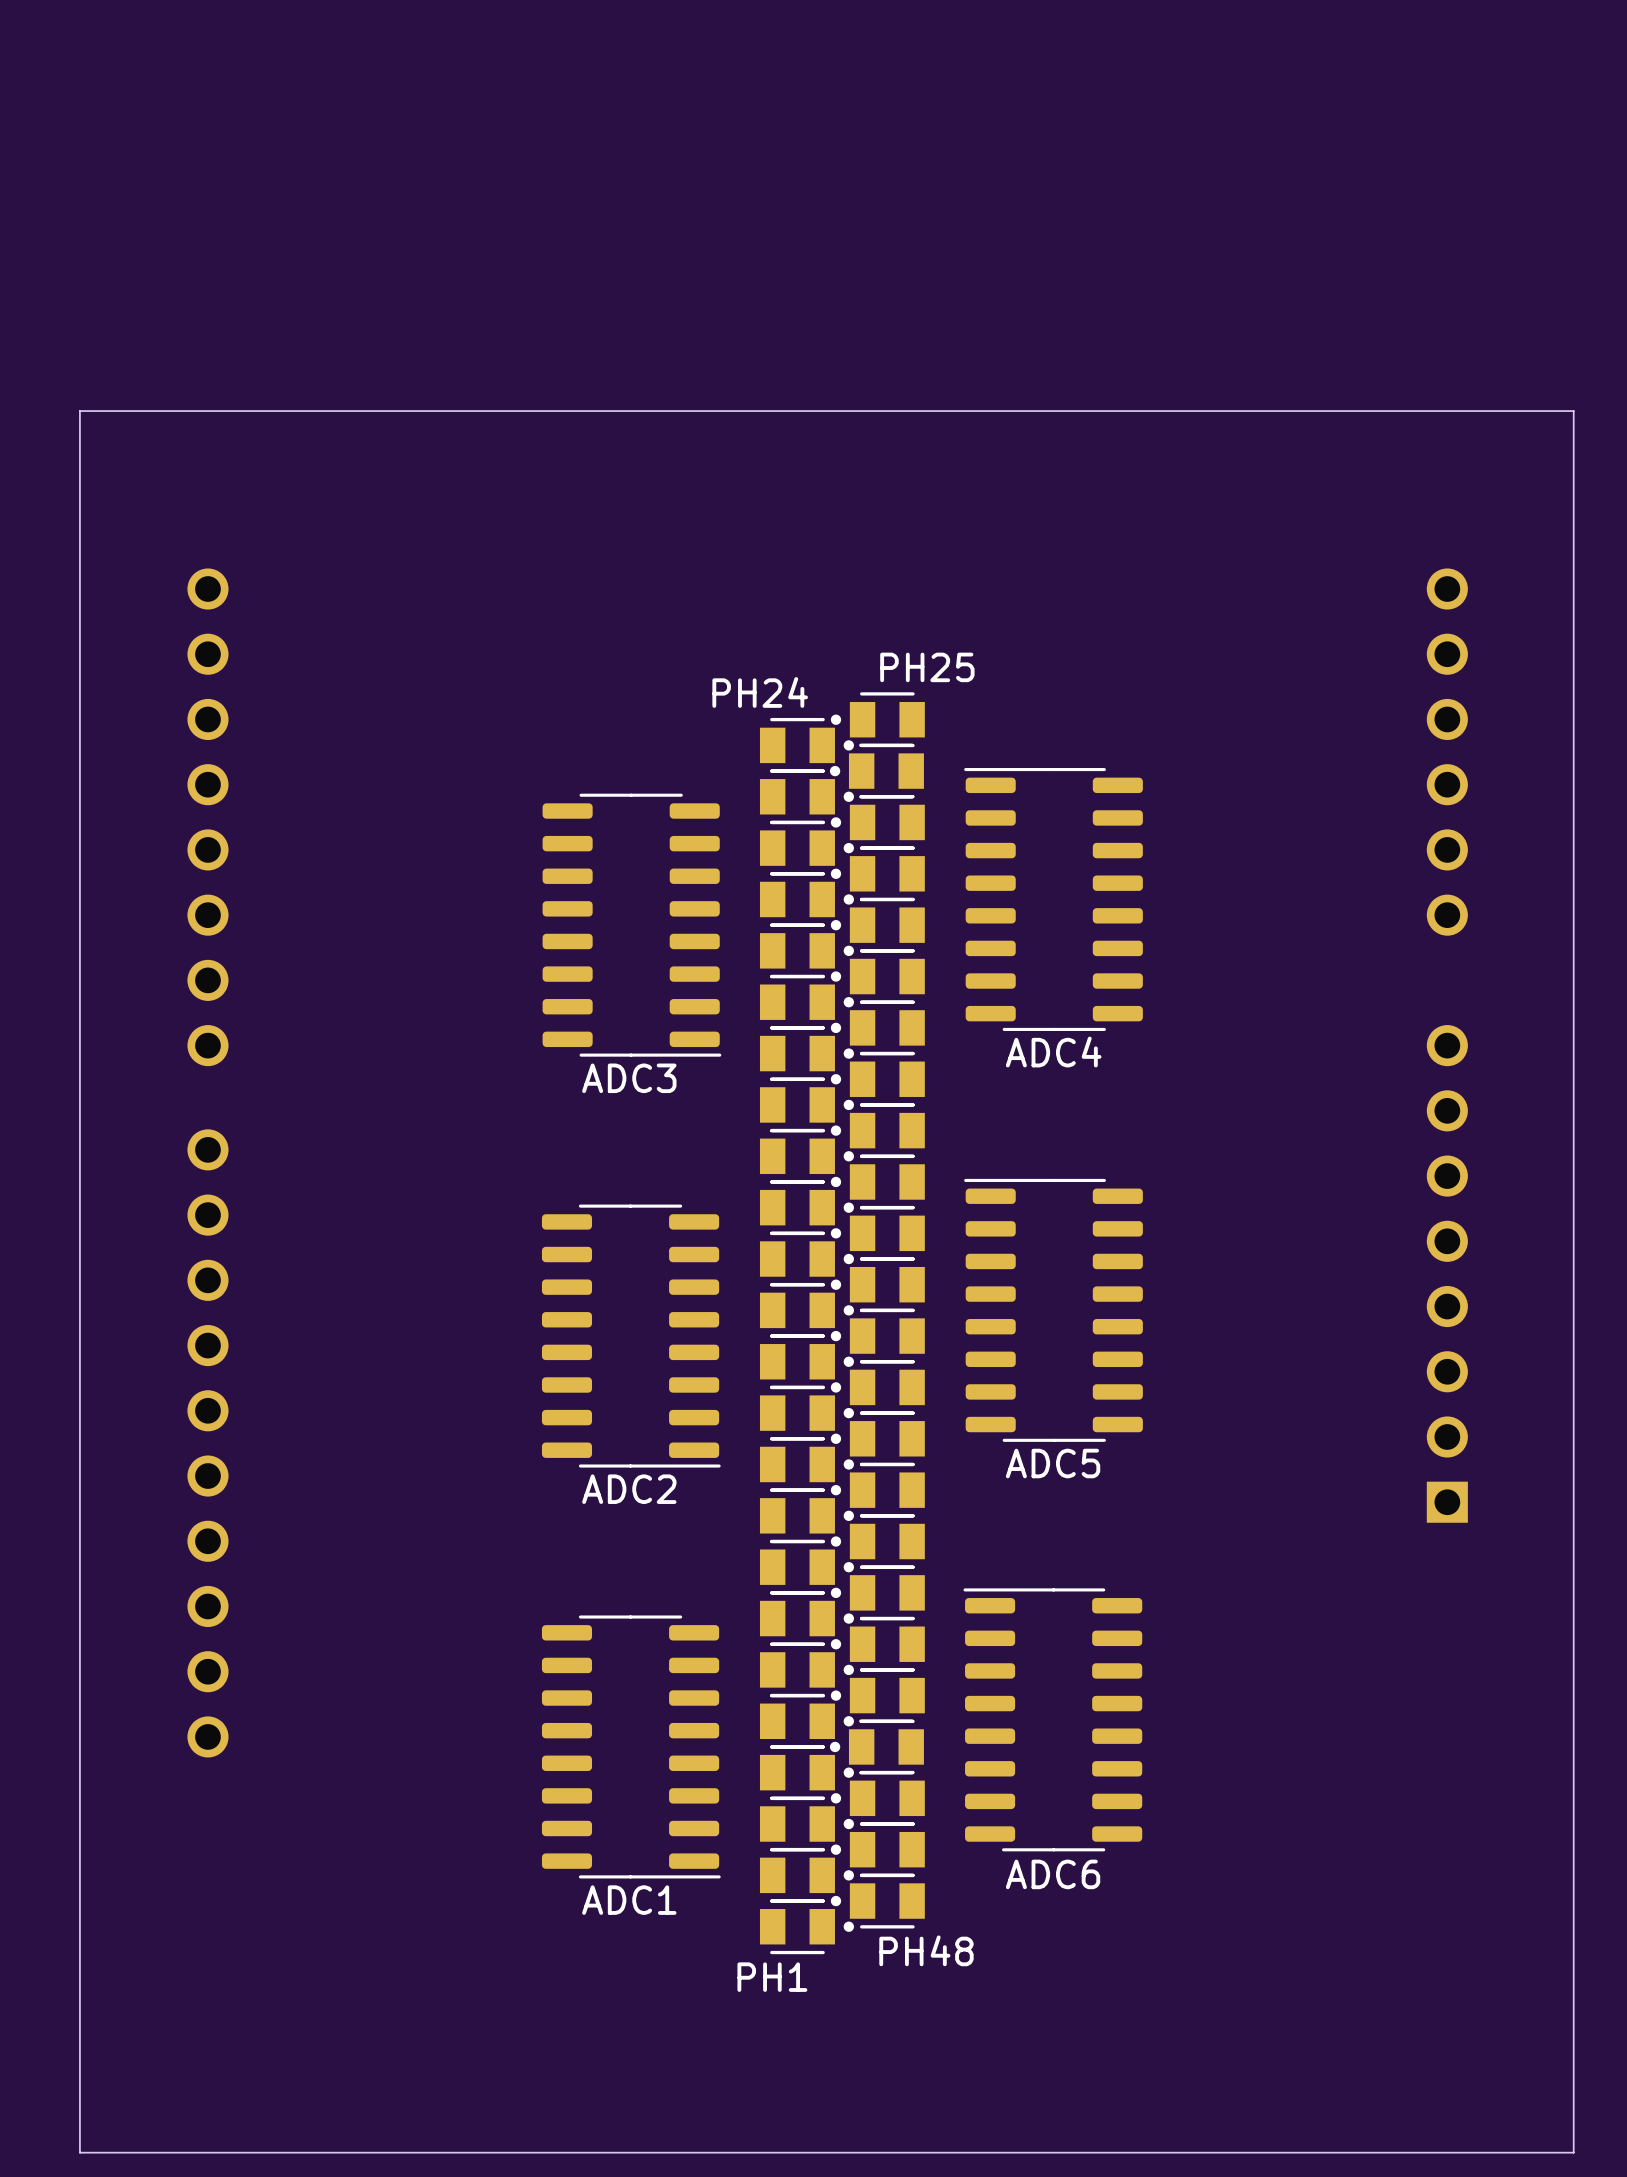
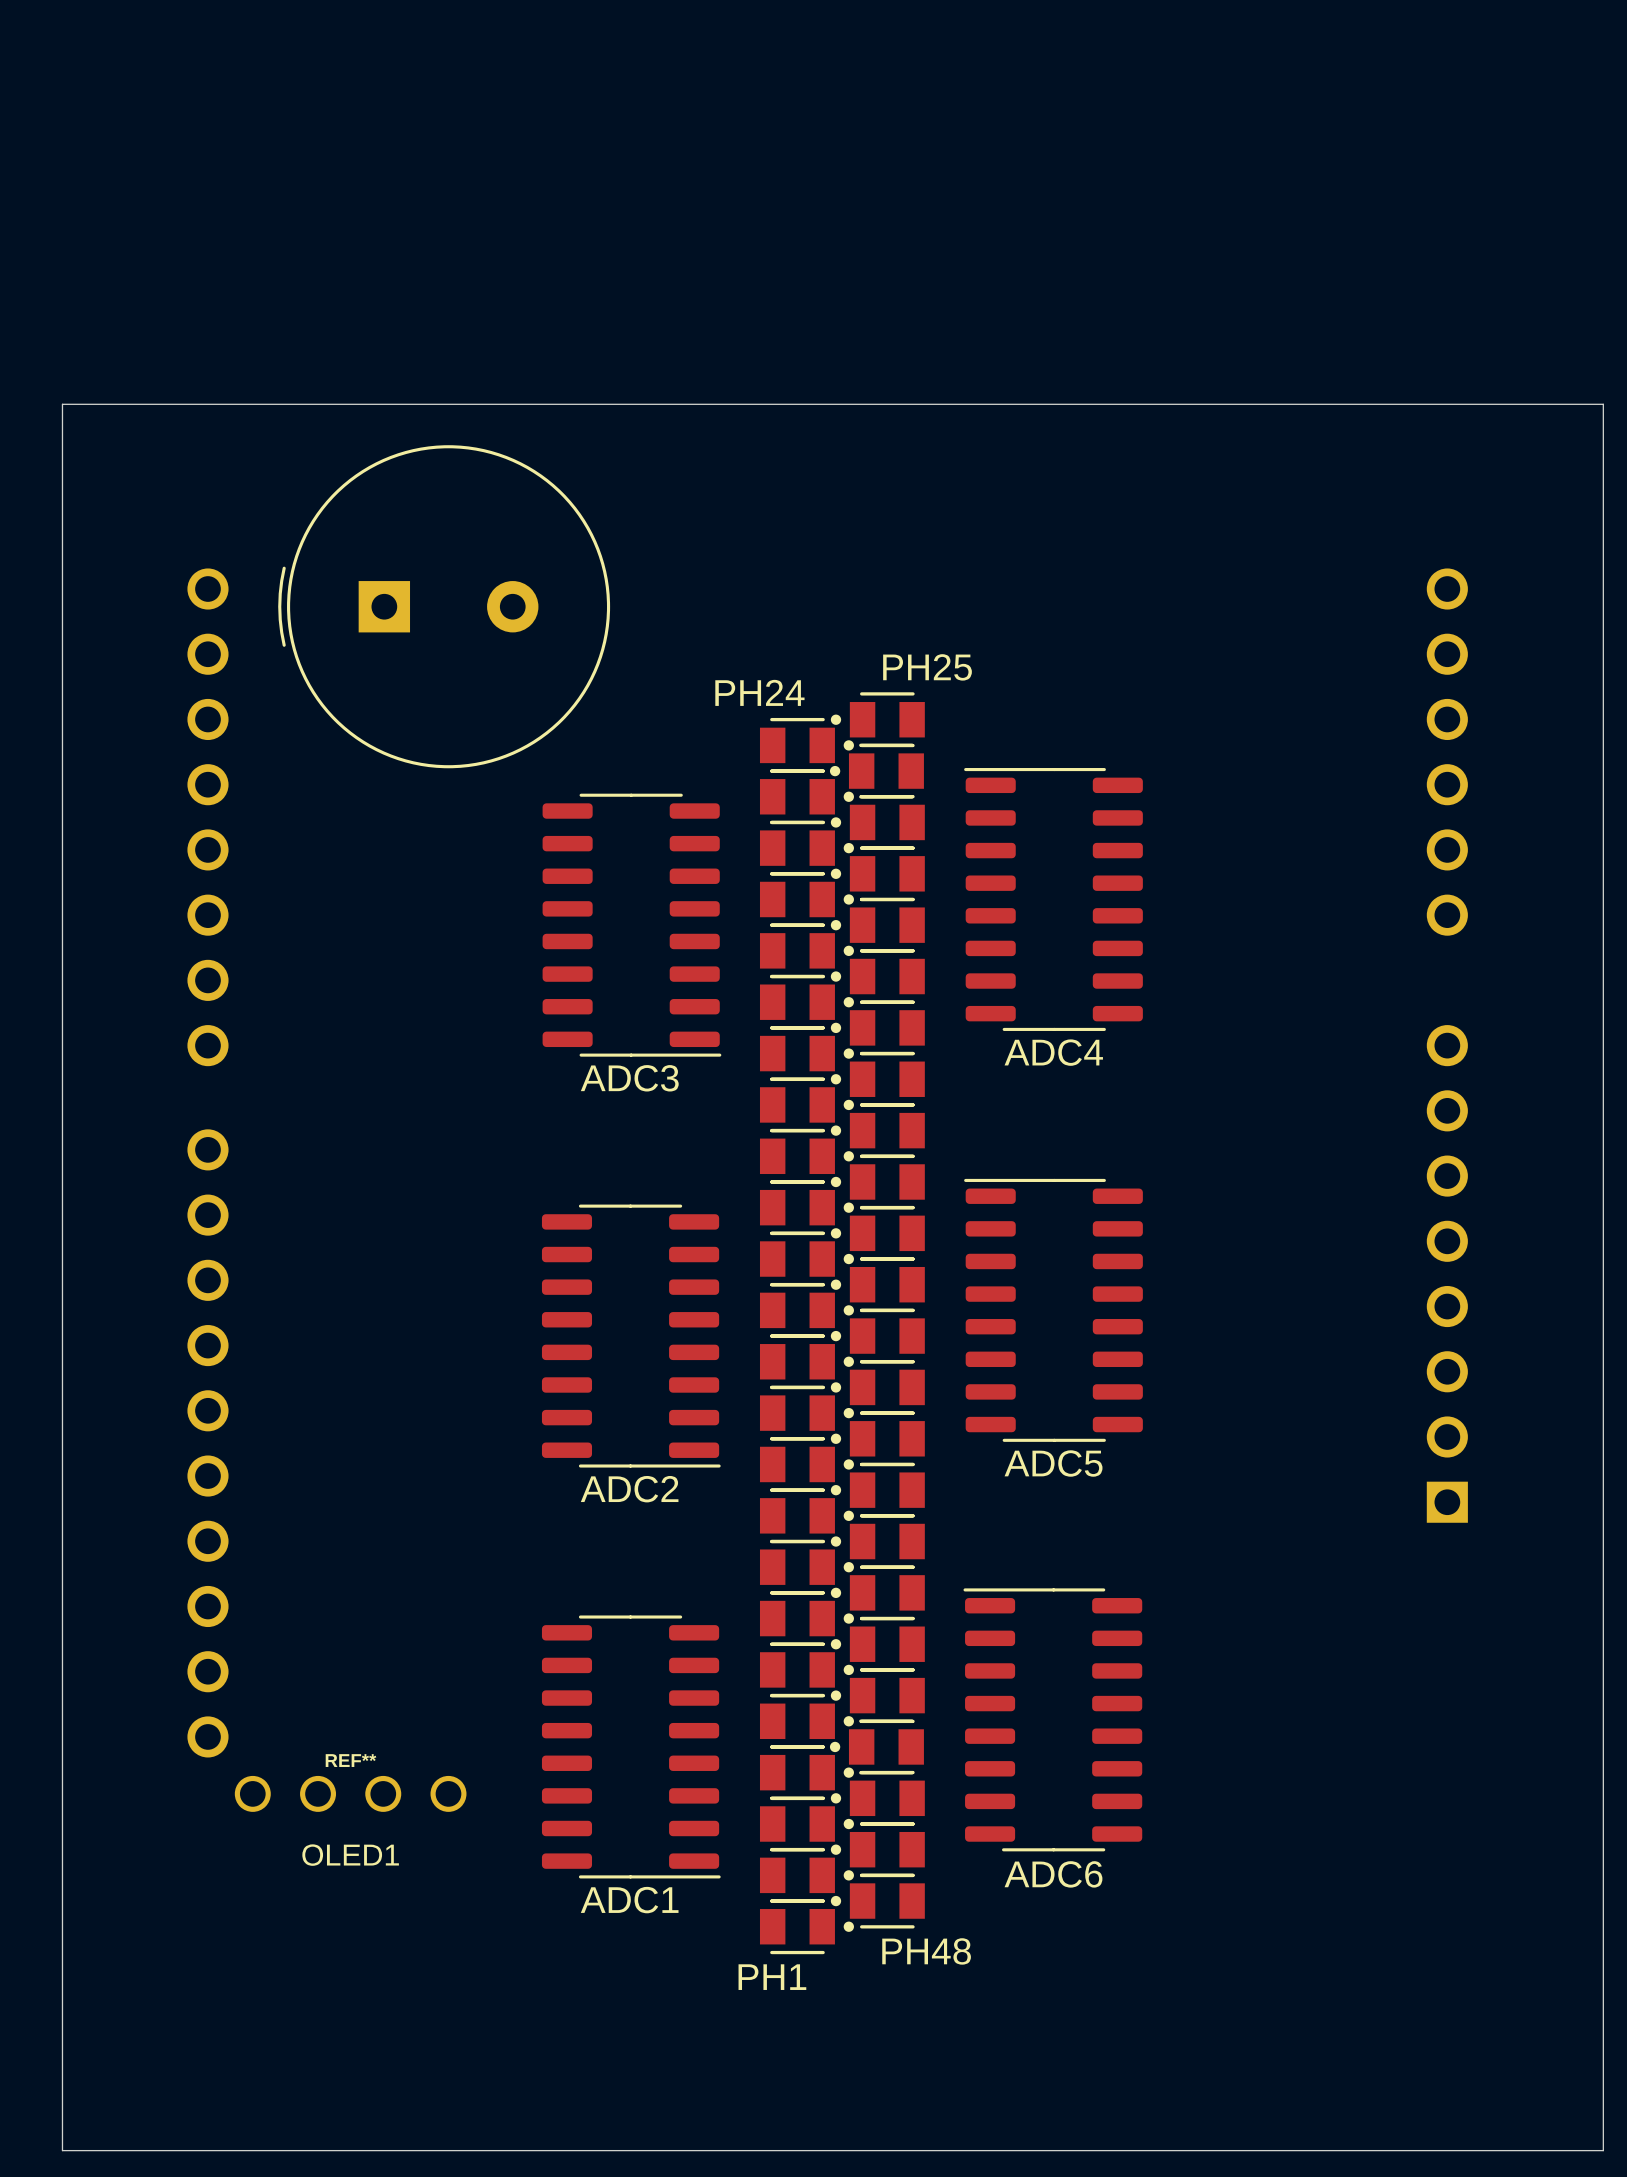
board edge: (79, 411) (1573, 411) (1573, 2152) (79, 2152) (79, 411) -> (62, 404) (62, 2150) (1603, 2150) (1603, 404) (62, 404)
part: none -> (444, 606)
OLED1: none -> (350, 1793)

